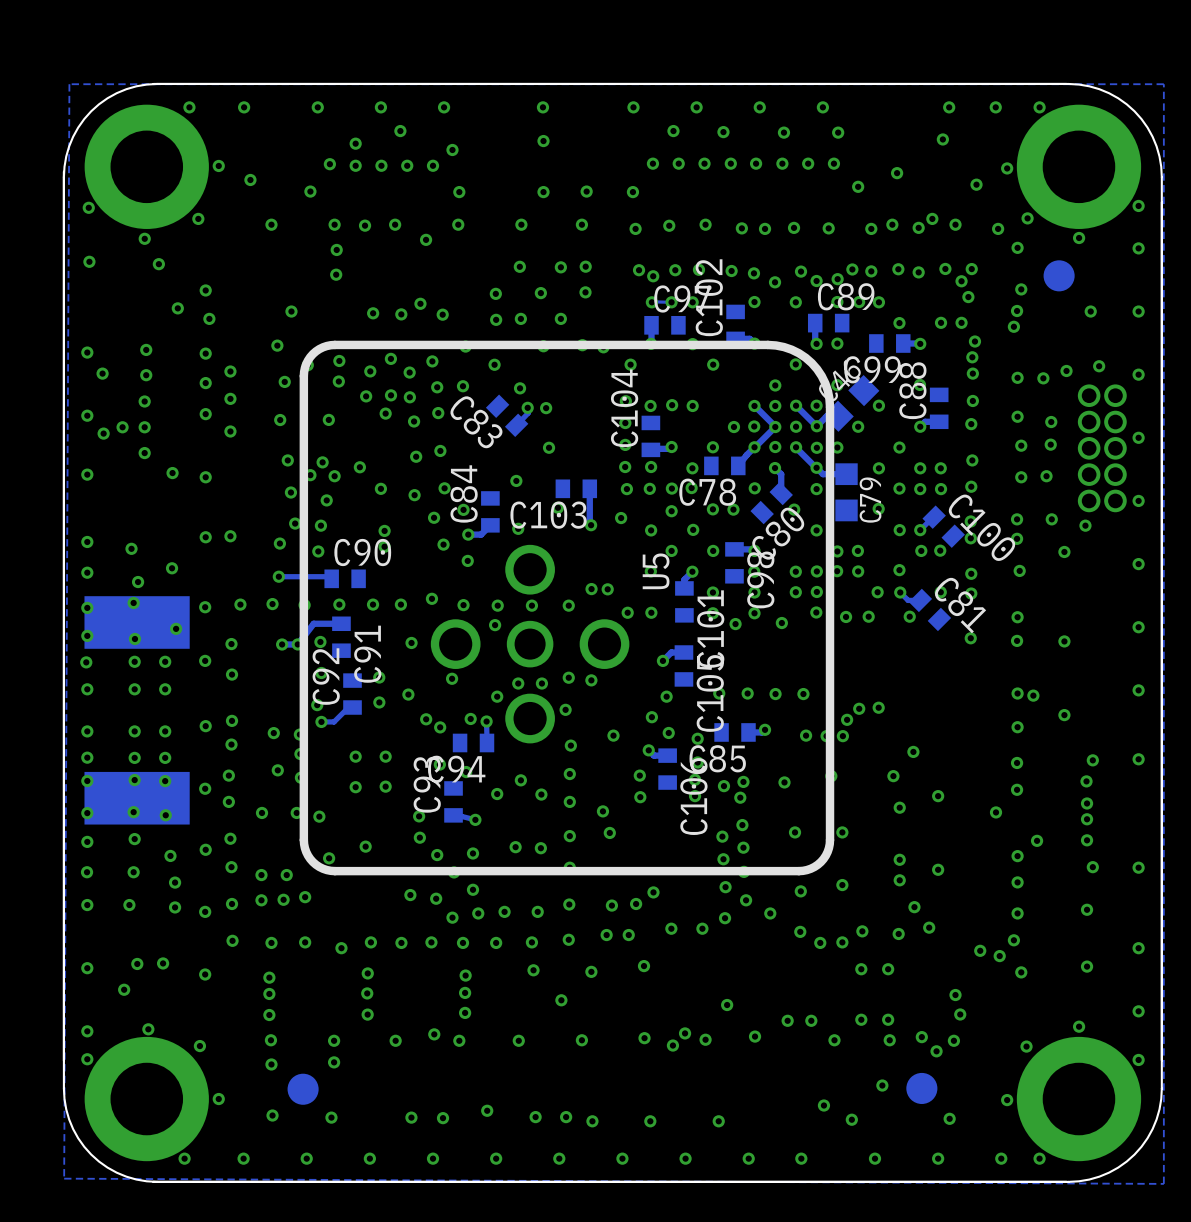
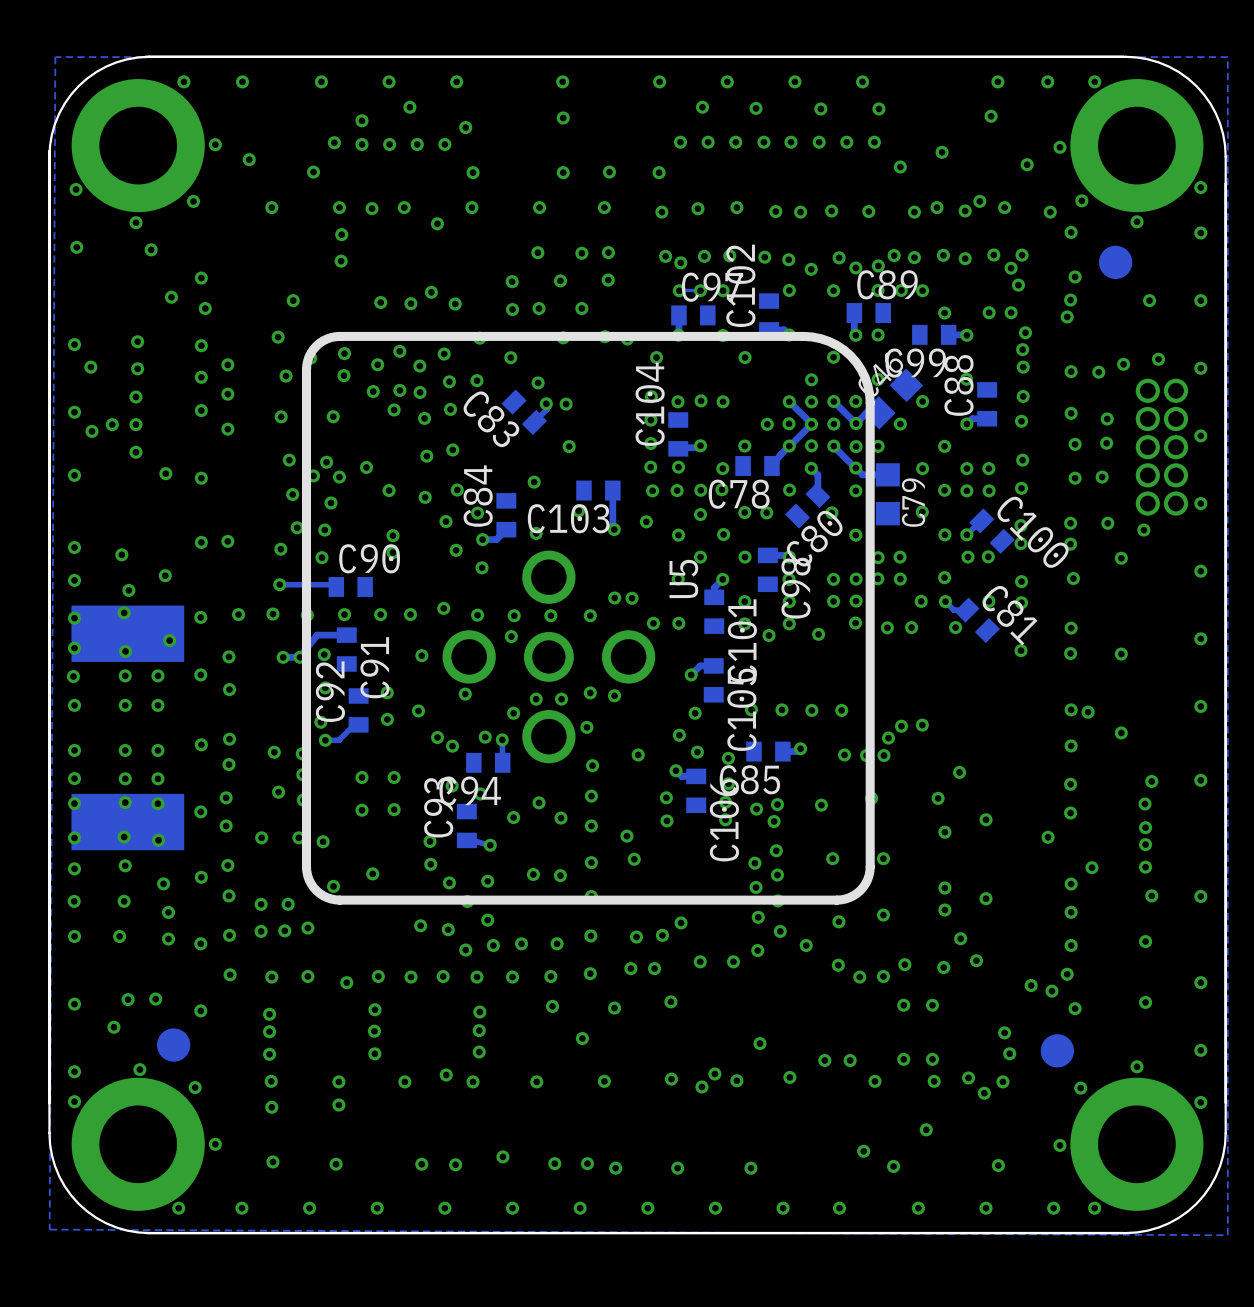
part position: (921, 1088) -> (1057, 1050)
part position: (303, 1089) -> (173, 1045)

